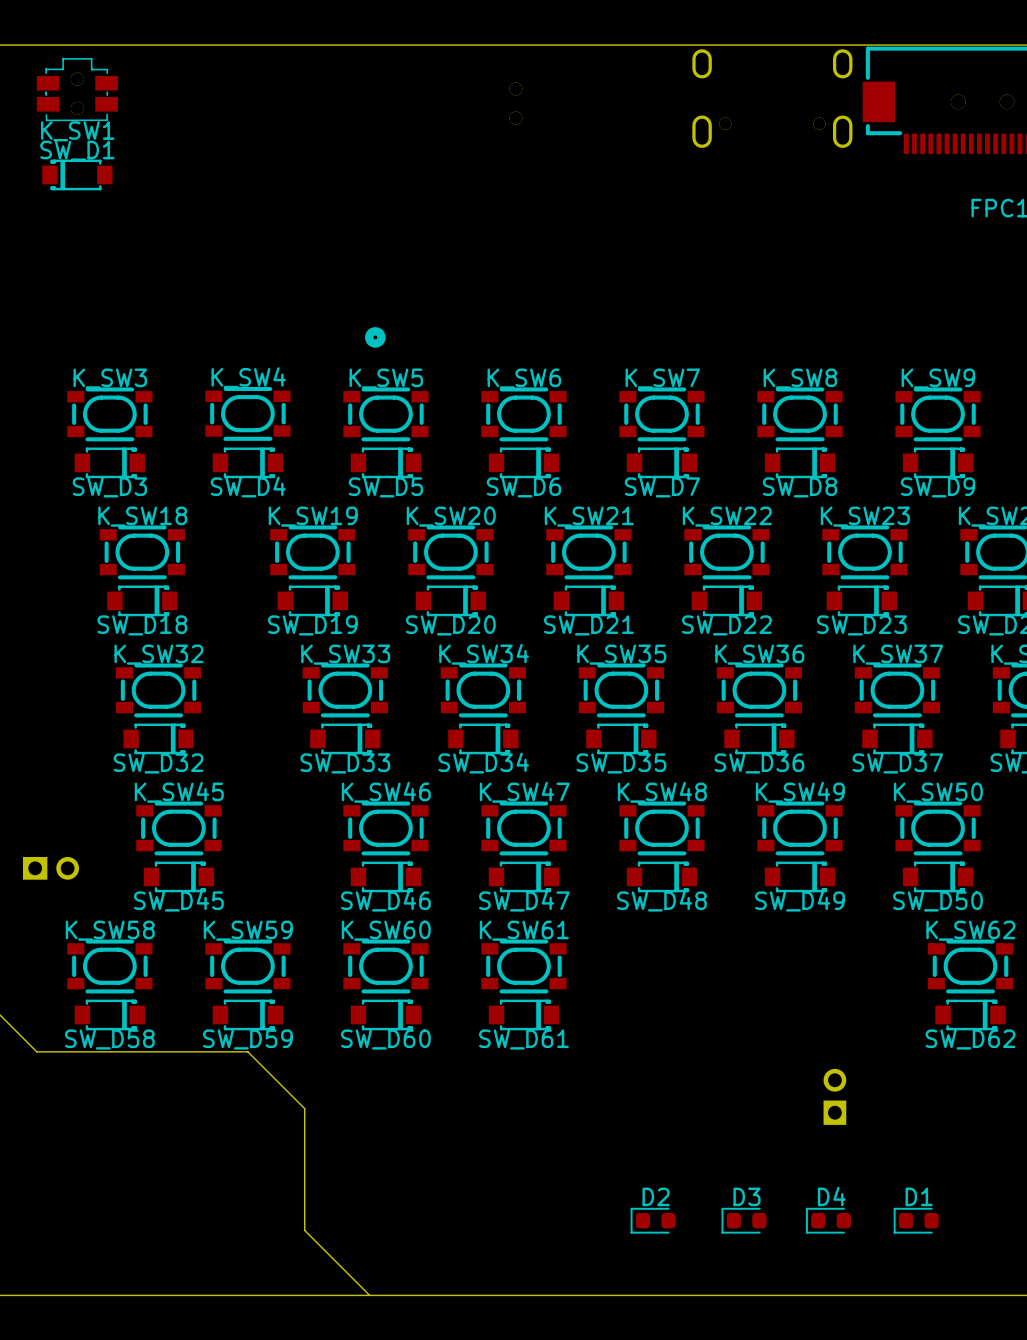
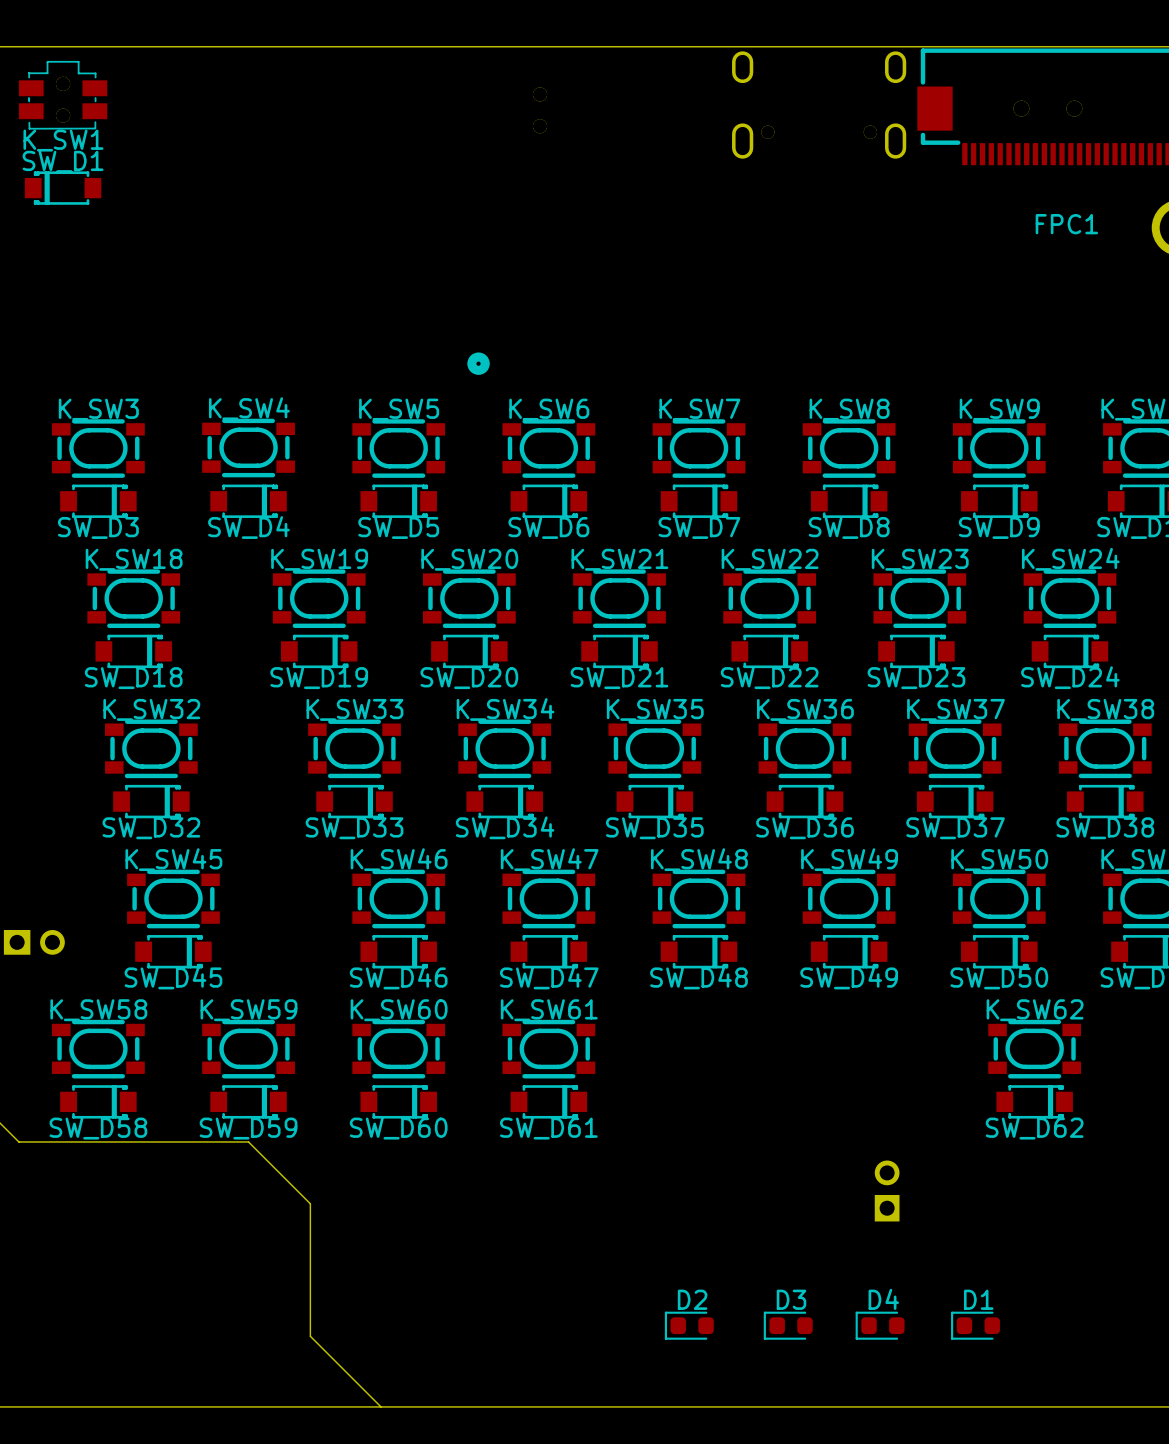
part position: (375, 337) -> (478, 363)

